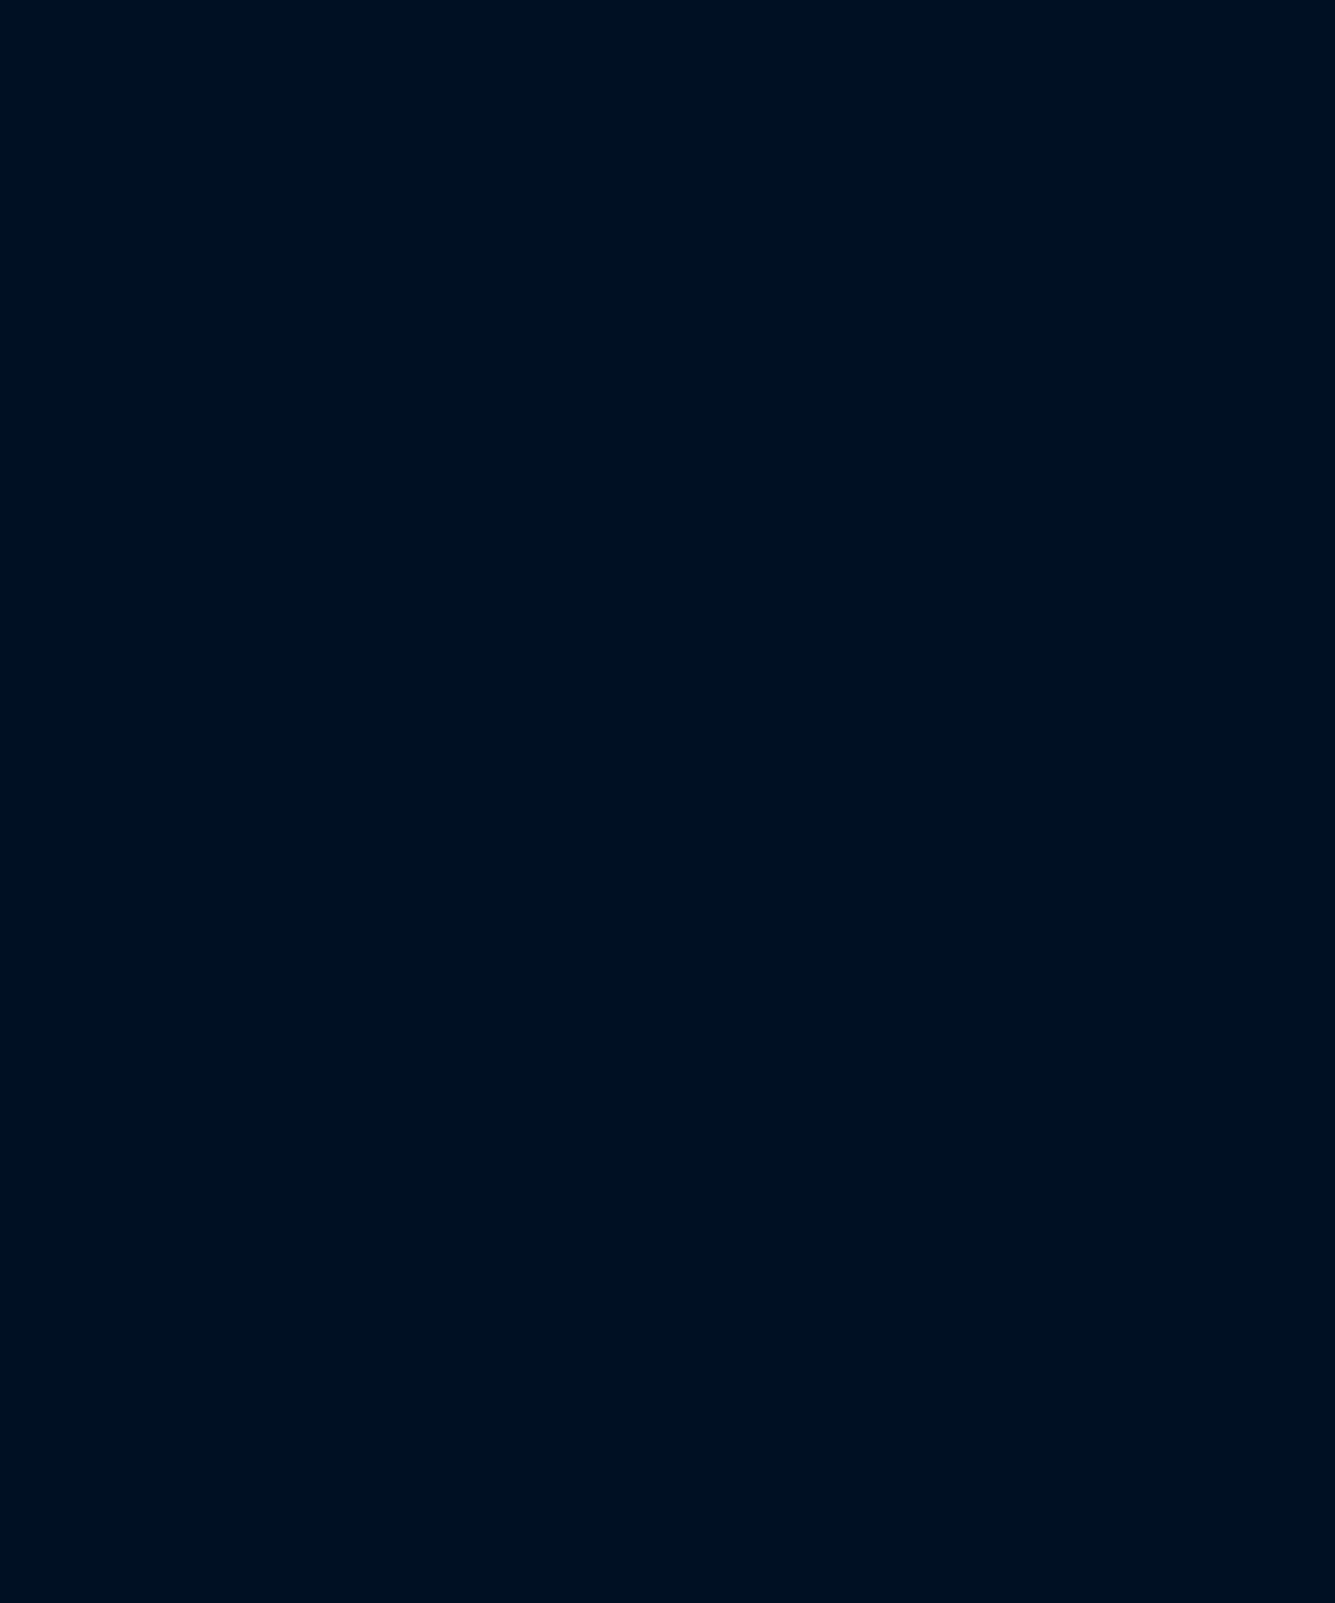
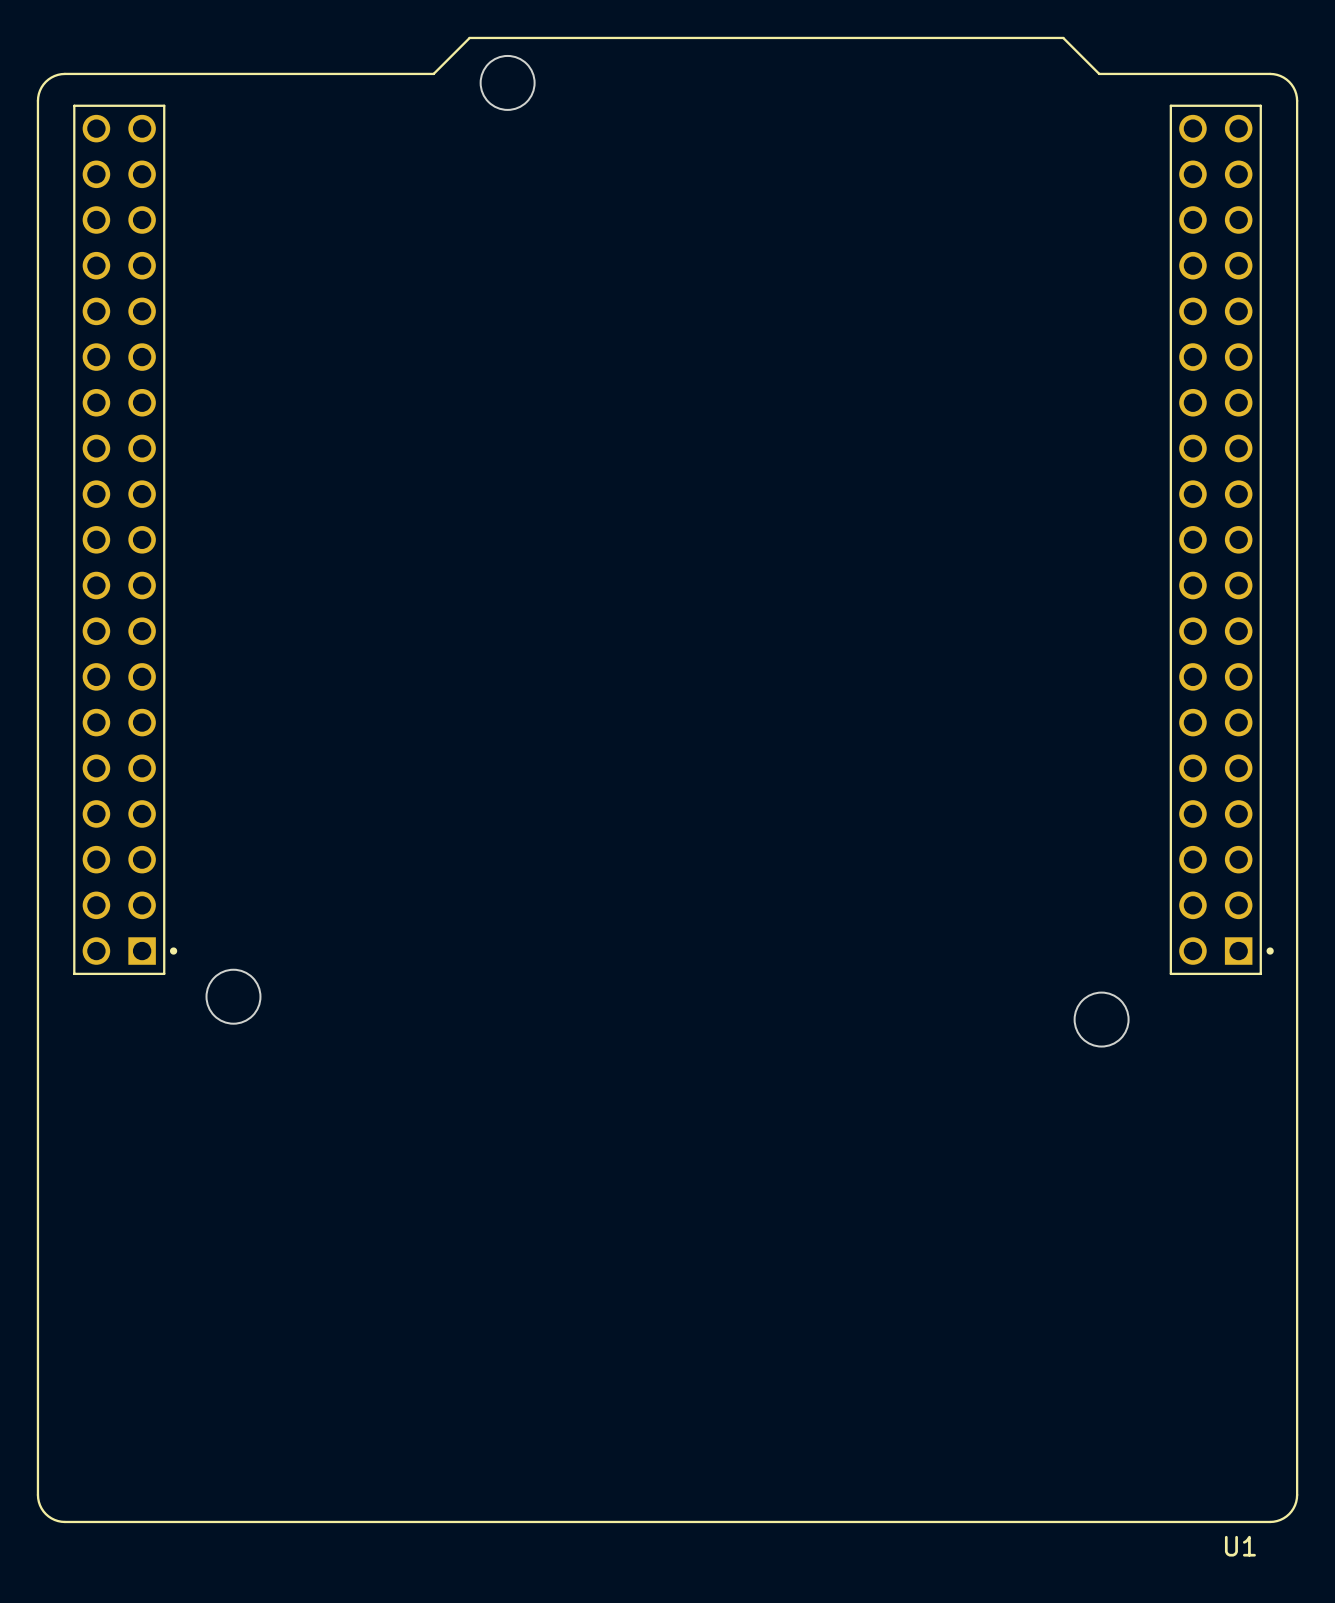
U1: none -> (667, 779)

